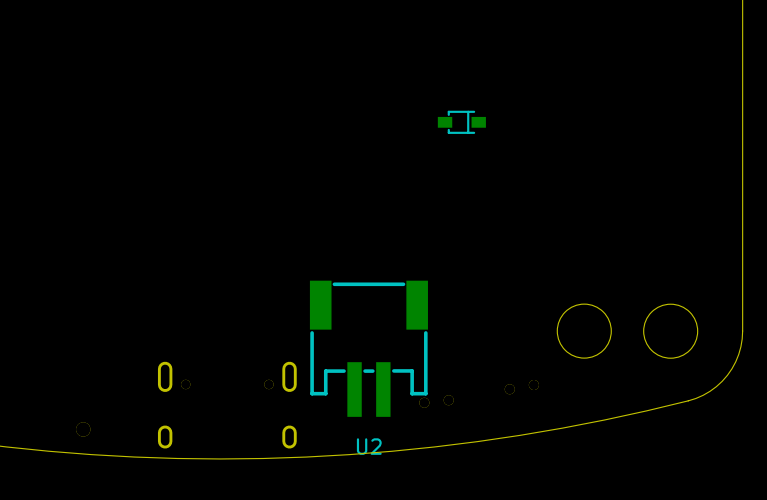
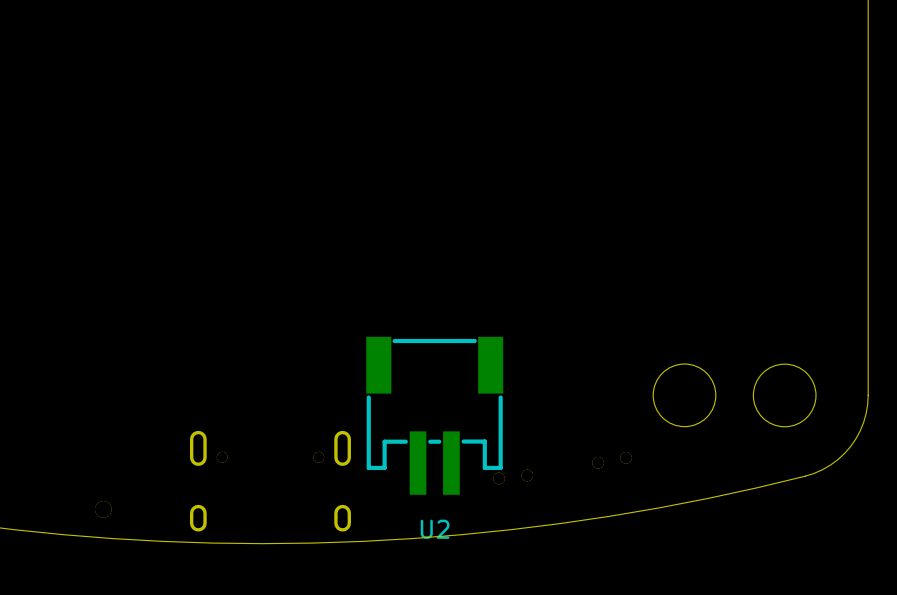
part: (461, 122) -> none

